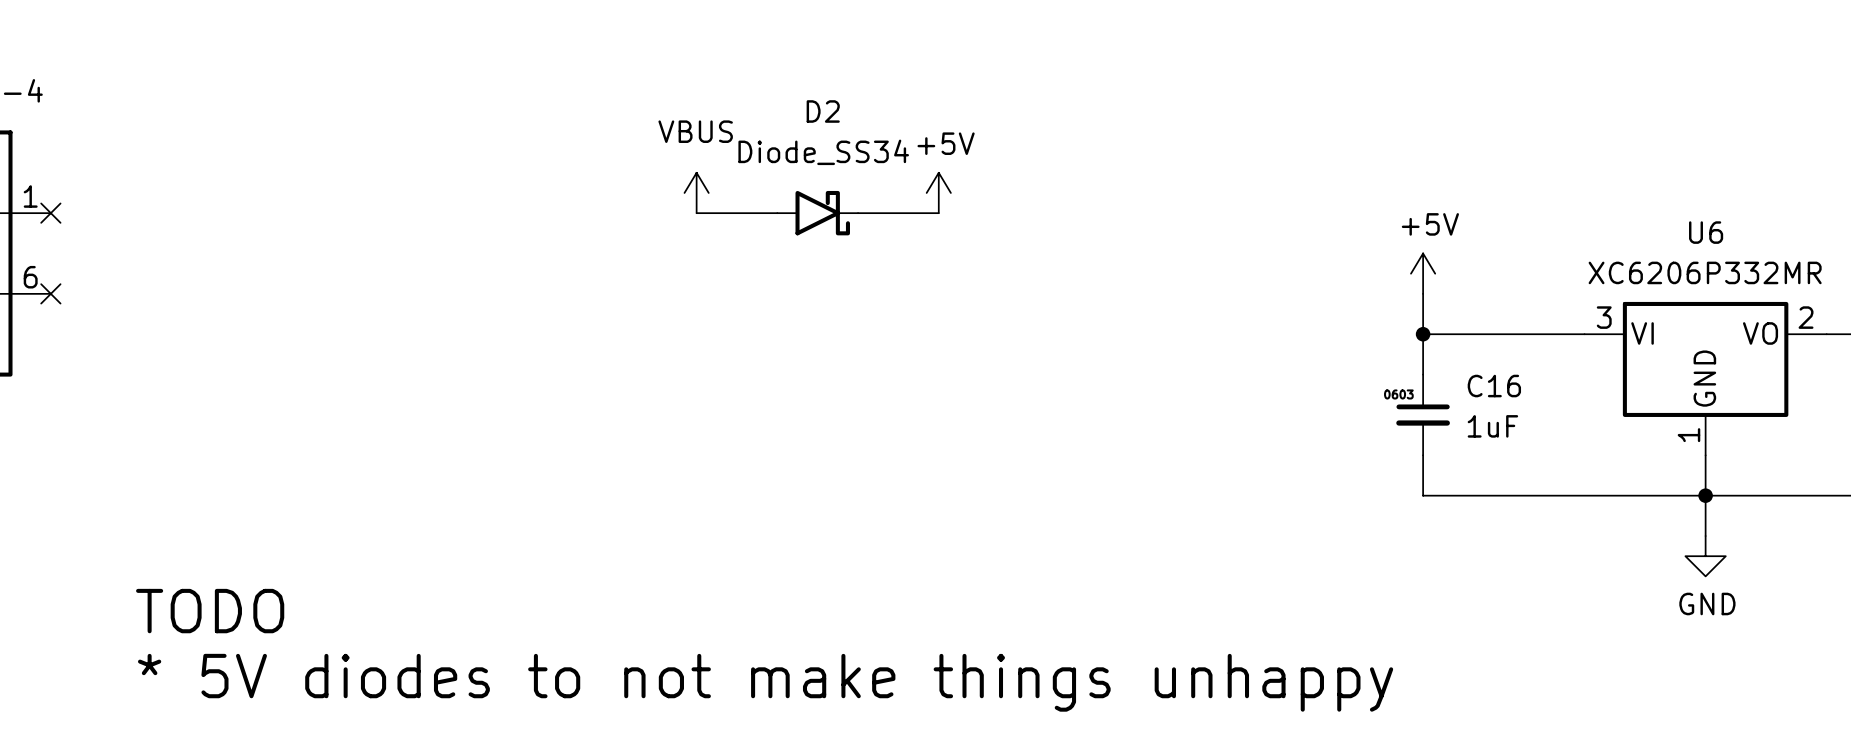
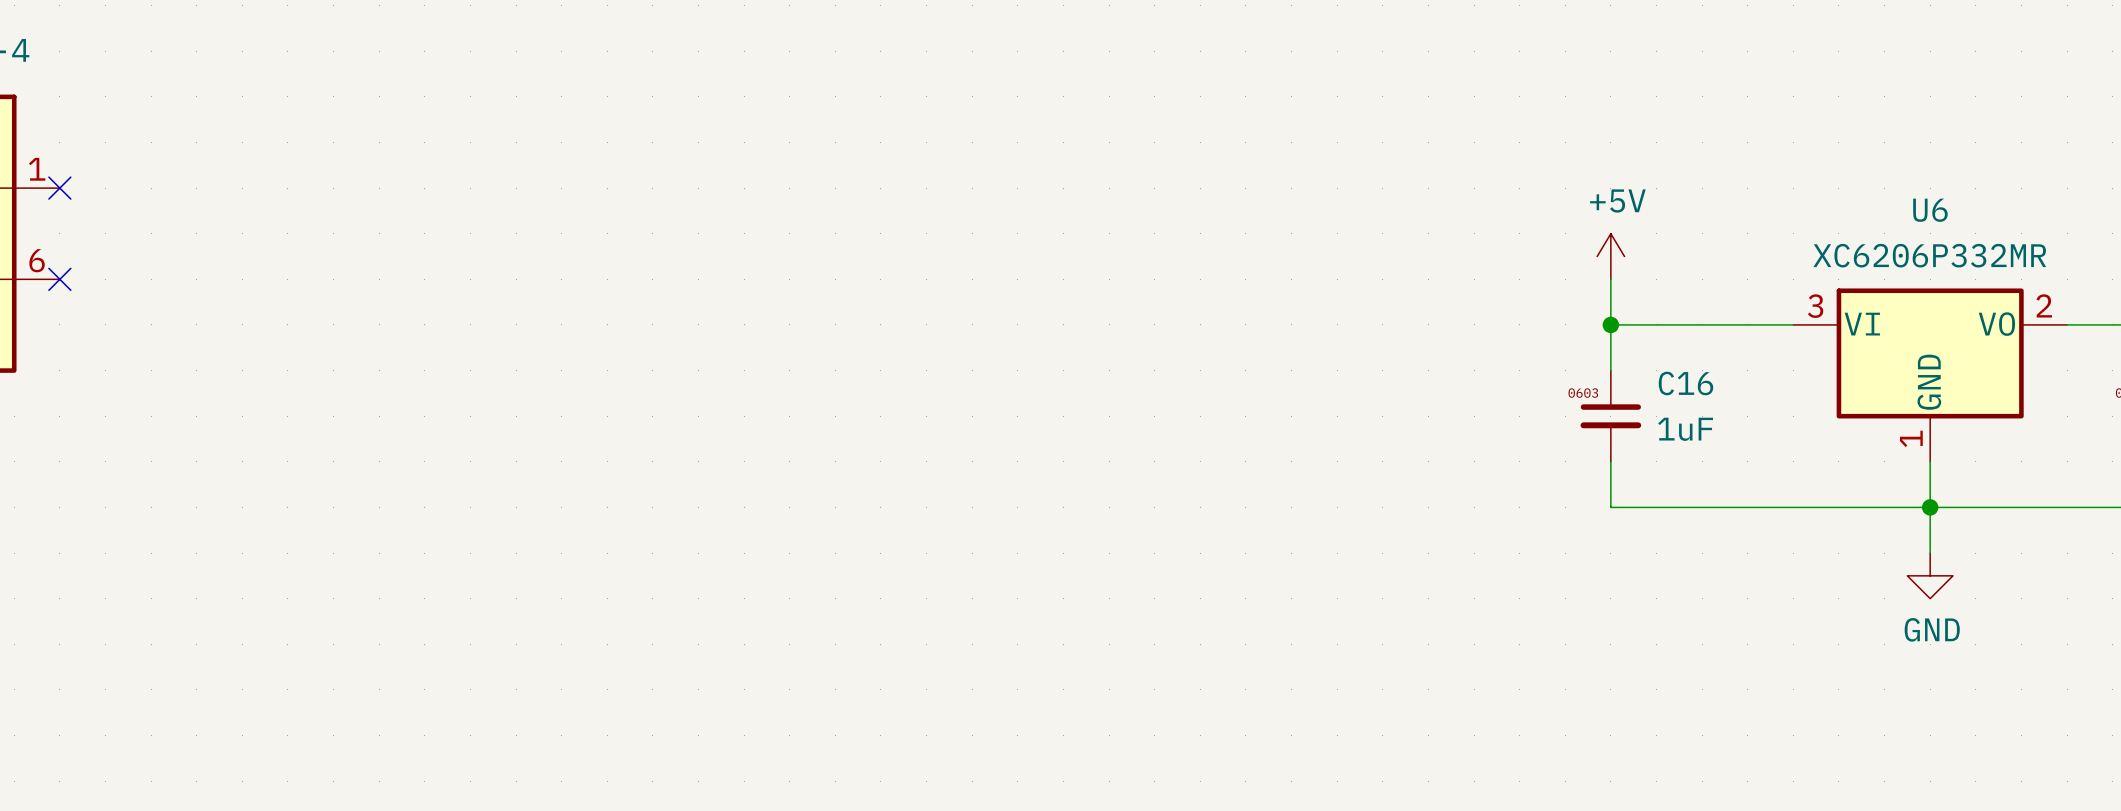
power symbol: VBUS (696, 192) -> none
power symbol: +5V (938, 192) -> none
wire: (696, 213) (777, 213) -> none
D2: Diode_SS34 (817, 213) -> none
wire: (858, 213) (938, 213) -> none
text: TODO (210, 611) -> none
text: * 5V diodes to not make things unhappy (765, 682) -> none

